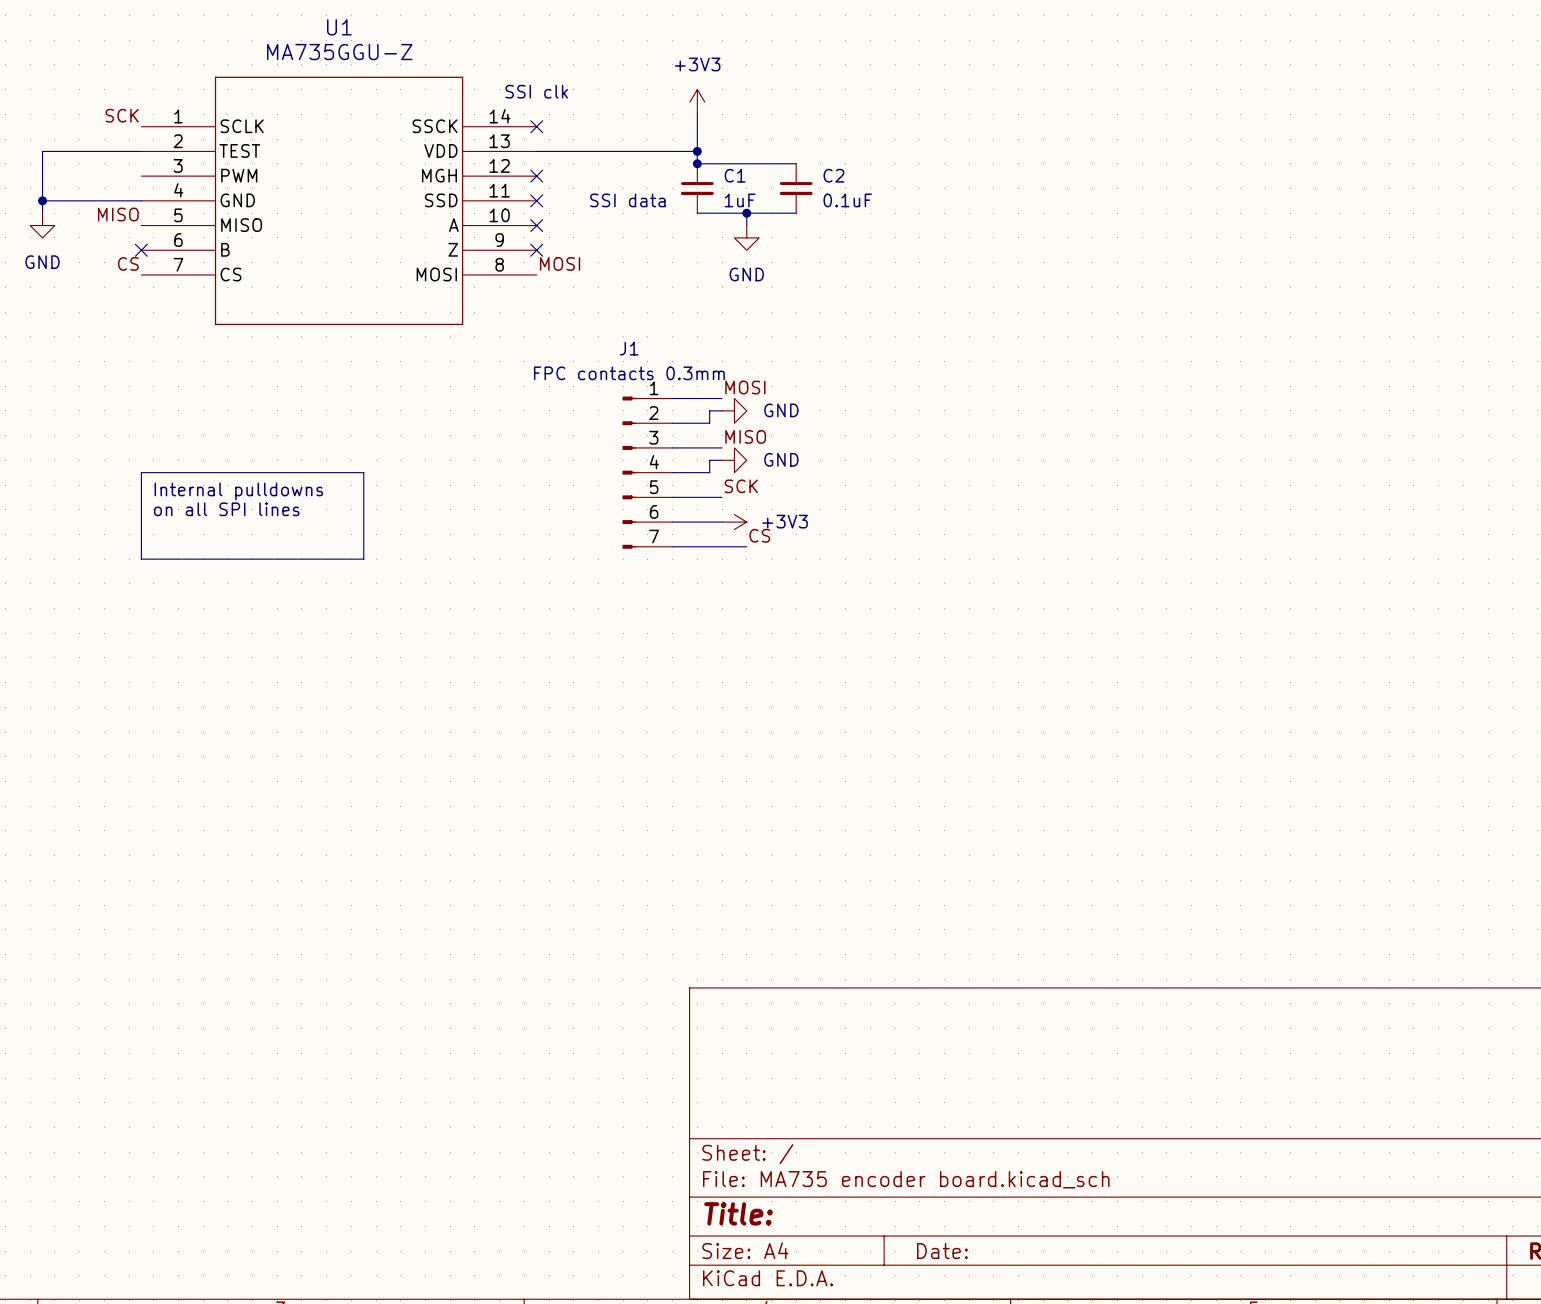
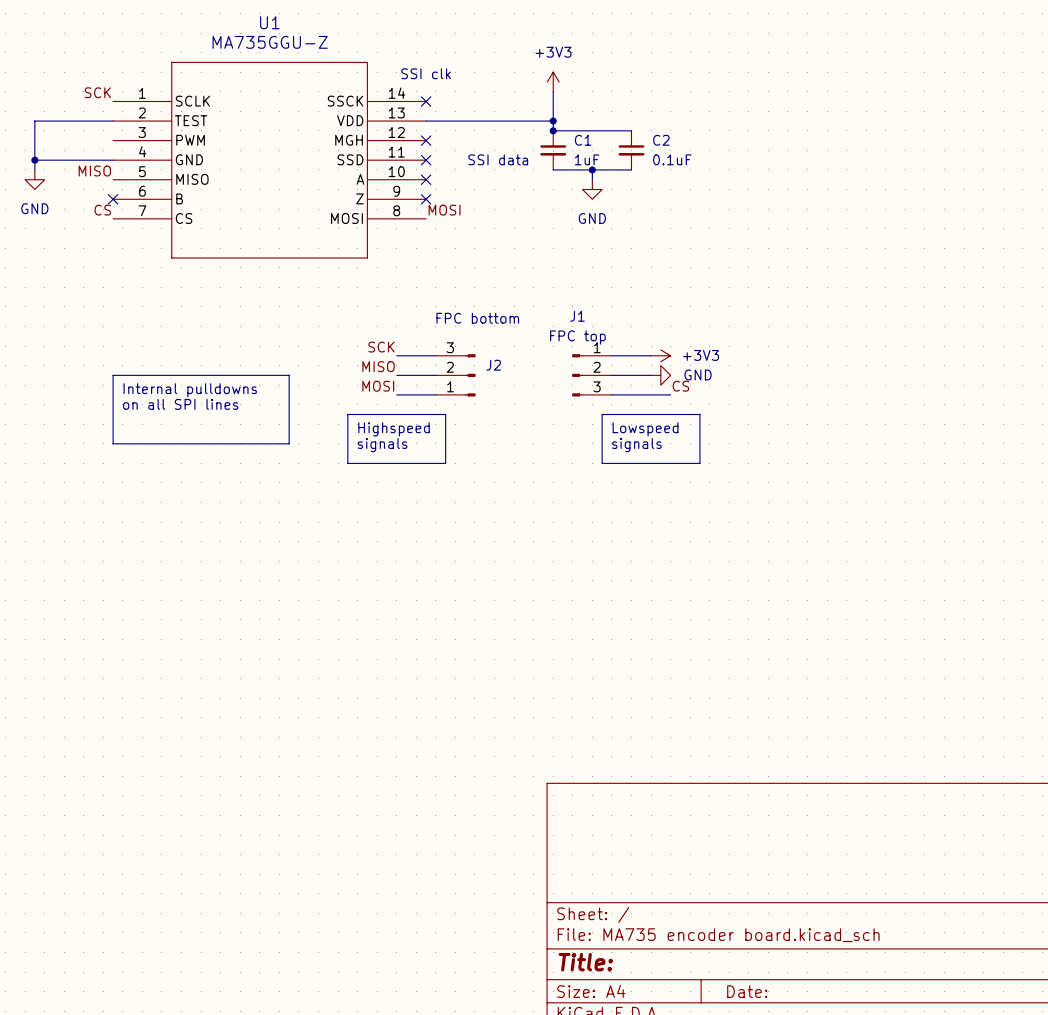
J1 name position: J1 (629, 348) -> J1 (577, 316)
J1 value: FPC contacts 0.3mm (629, 373) -> FPC top (577, 337)
label: MOSI (745, 387) -> none
J1 symbol: [622, 396, 673, 549] -> [572, 354, 612, 397]
wire: (672, 398) (722, 398) -> (396, 375) (435, 375)
wire: (722, 410) (709, 410) (709, 423) (672, 423) -> none
power symbol: GND (734, 410) -> none
label position: MISO (745, 436) -> MISO (378, 366)
wire: (672, 447) (722, 447) -> (396, 355) (435, 355)
wire: (722, 460) (709, 460) (709, 472) (672, 472) -> none
power symbol: GND (734, 460) -> none
J2: none -> FPC bottom (455, 375)
power symbol: none -> GND (660, 375)
label: none -> MOSI (378, 386)
label position: SCK (741, 486) -> SCK (381, 347)
wire: none -> (396, 394) (435, 394)
wire: (672, 497) (722, 497) -> (611, 355) (651, 355)
line: none -> (347, 414) (445, 414) (445, 463) (347, 463) (347, 414)
wire: (672, 522) (722, 522) -> (611, 375) (651, 375)
power symbol position: +3V3 (734, 522) -> +3V3 (660, 355)
line: none -> (602, 414) (699, 414) (699, 463) (602, 463) (602, 414)
label position: CS (759, 535) -> CS (680, 386)
text: none -> Highspeed (394, 429)
text: none -> Lowspeed (645, 429)
wire: (672, 546) (746, 546) -> (611, 394) (670, 394)
text: none -> signals (382, 445)
text: none -> signals (636, 445)

